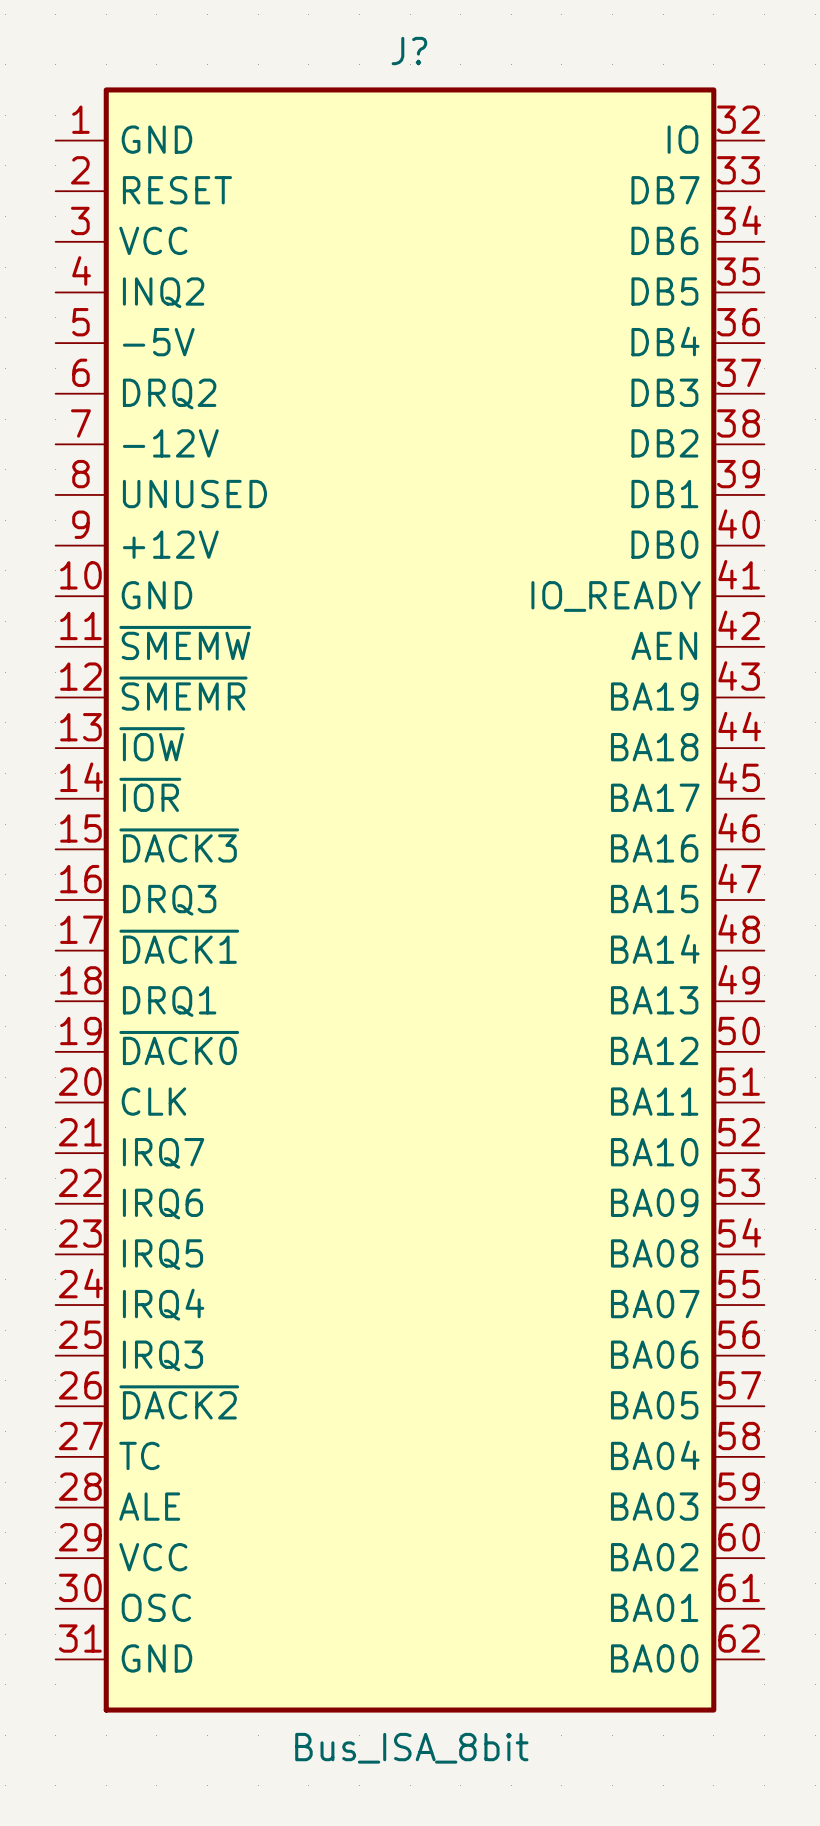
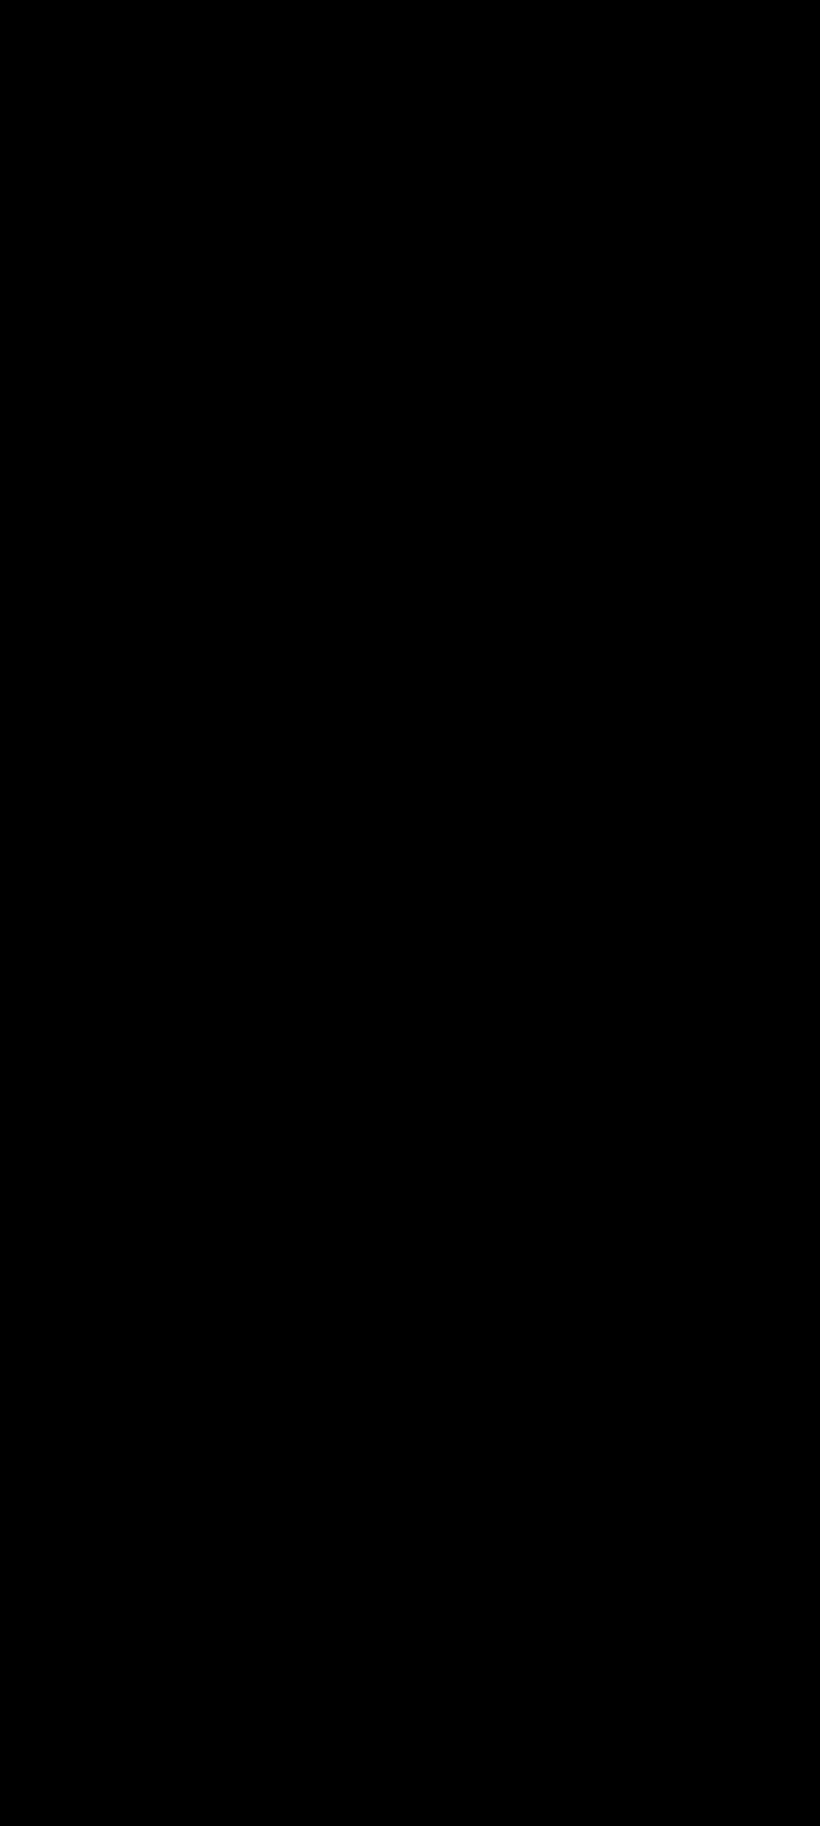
J?: Bus_ISA_8bit (410, 899) -> none

